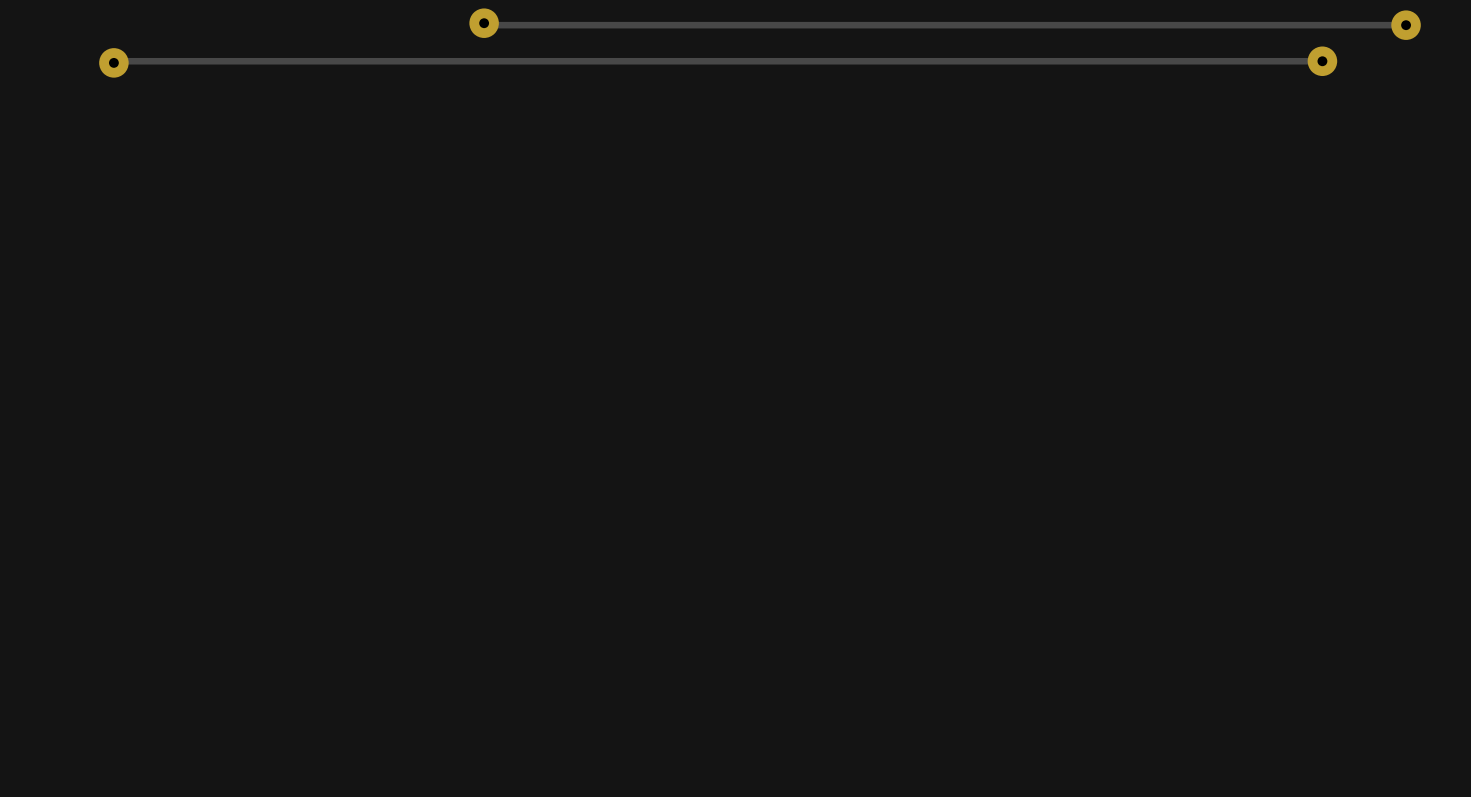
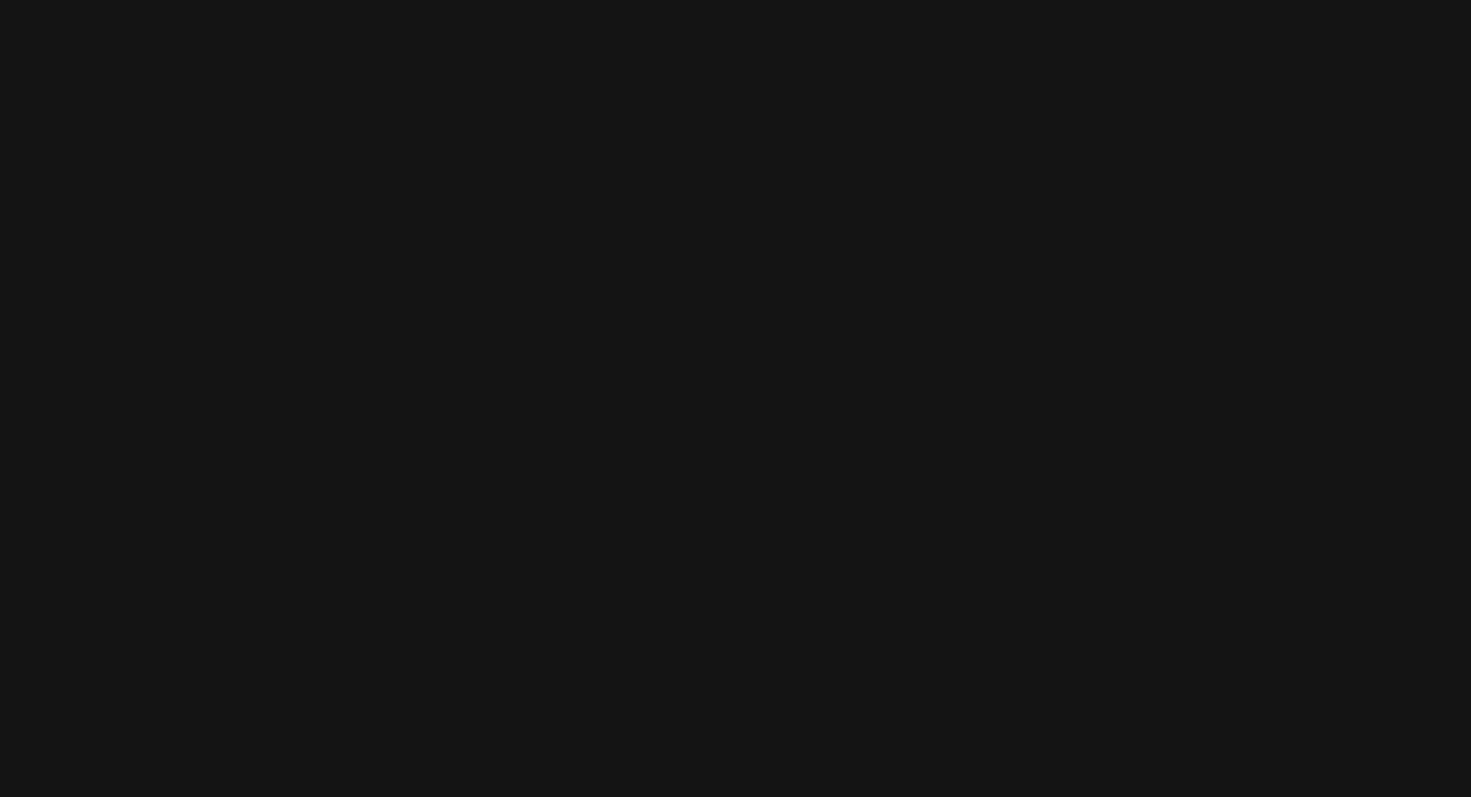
track: (484, 23) (486, 25) (1406, 25) -> none
via: (484, 23) -> none
via: (1406, 25) -> none
track: (1322, 61) (115, 61) (113, 62) -> none
via: (1322, 61) -> none
via: (113, 62) -> none

